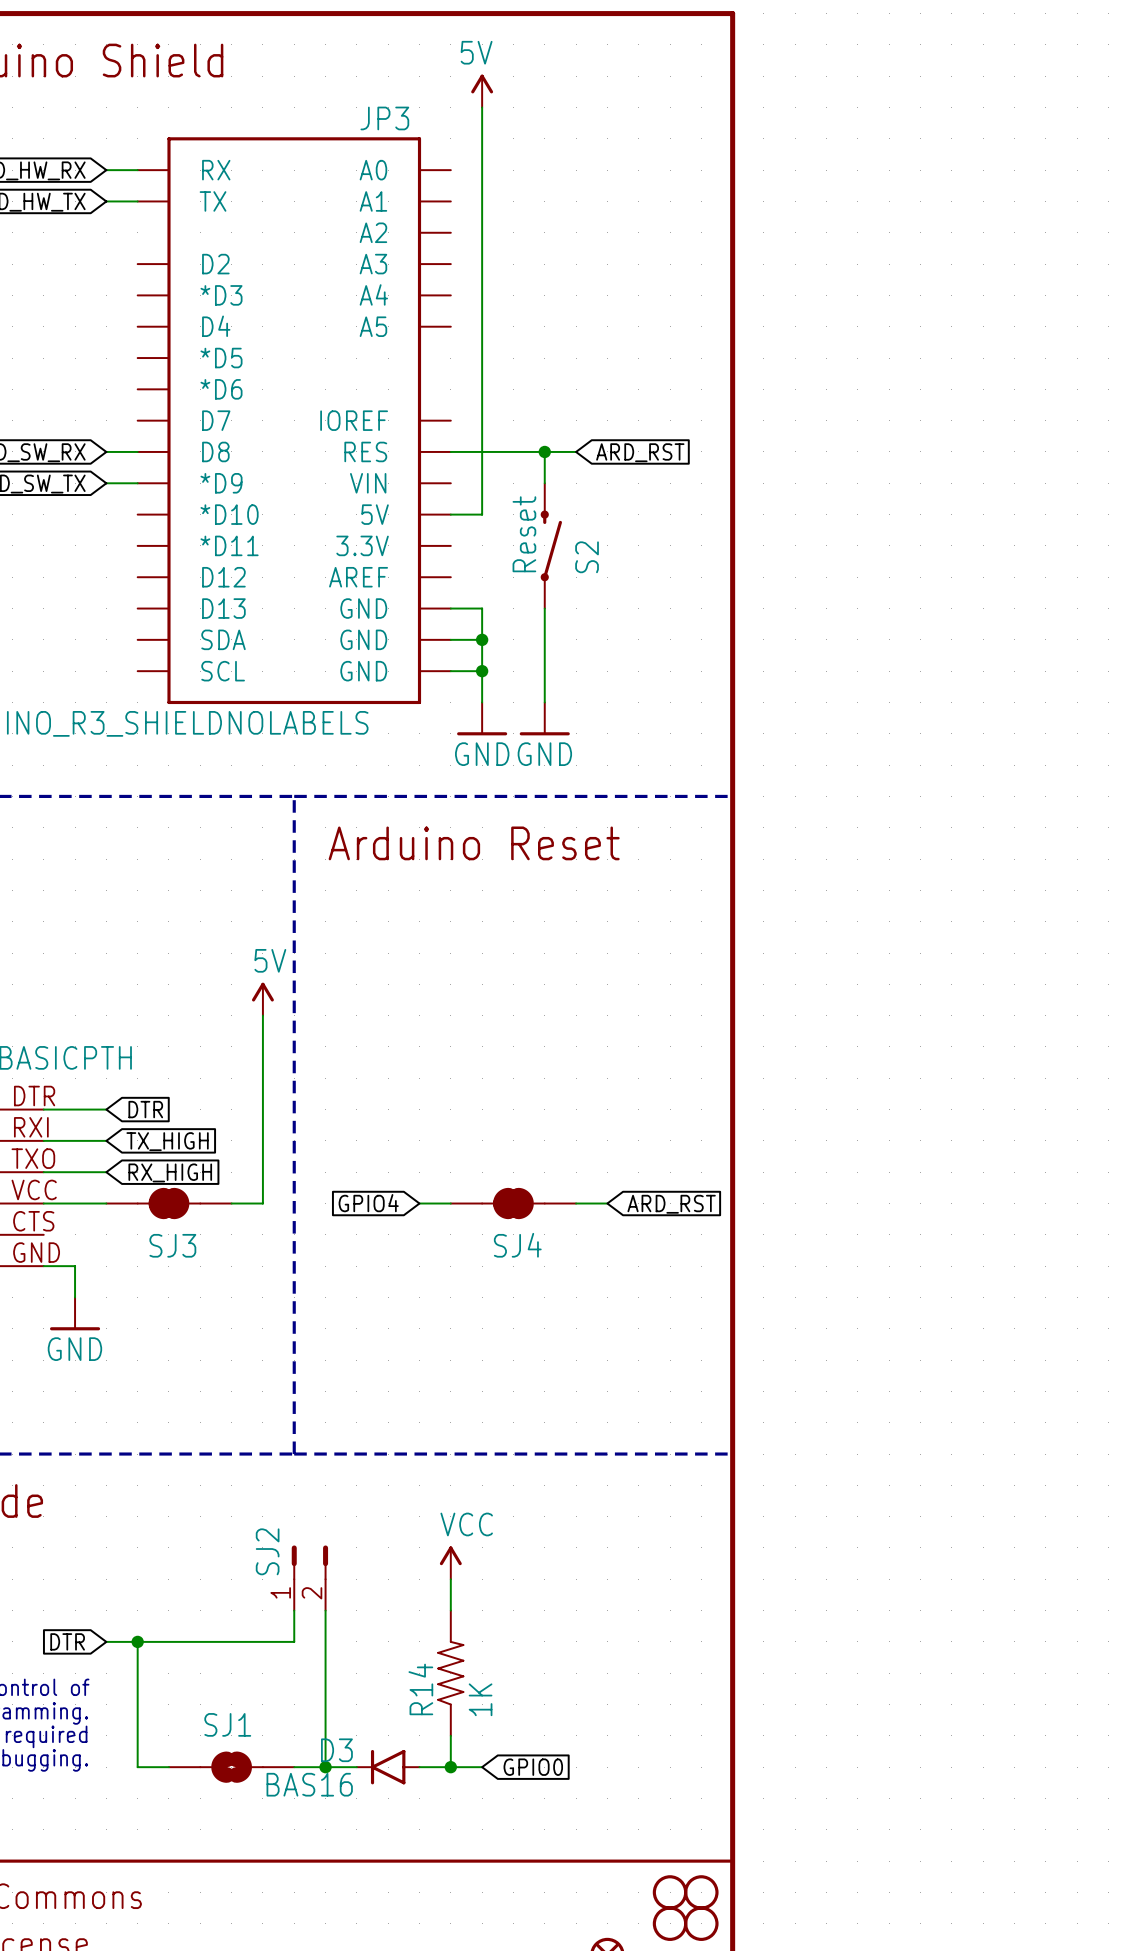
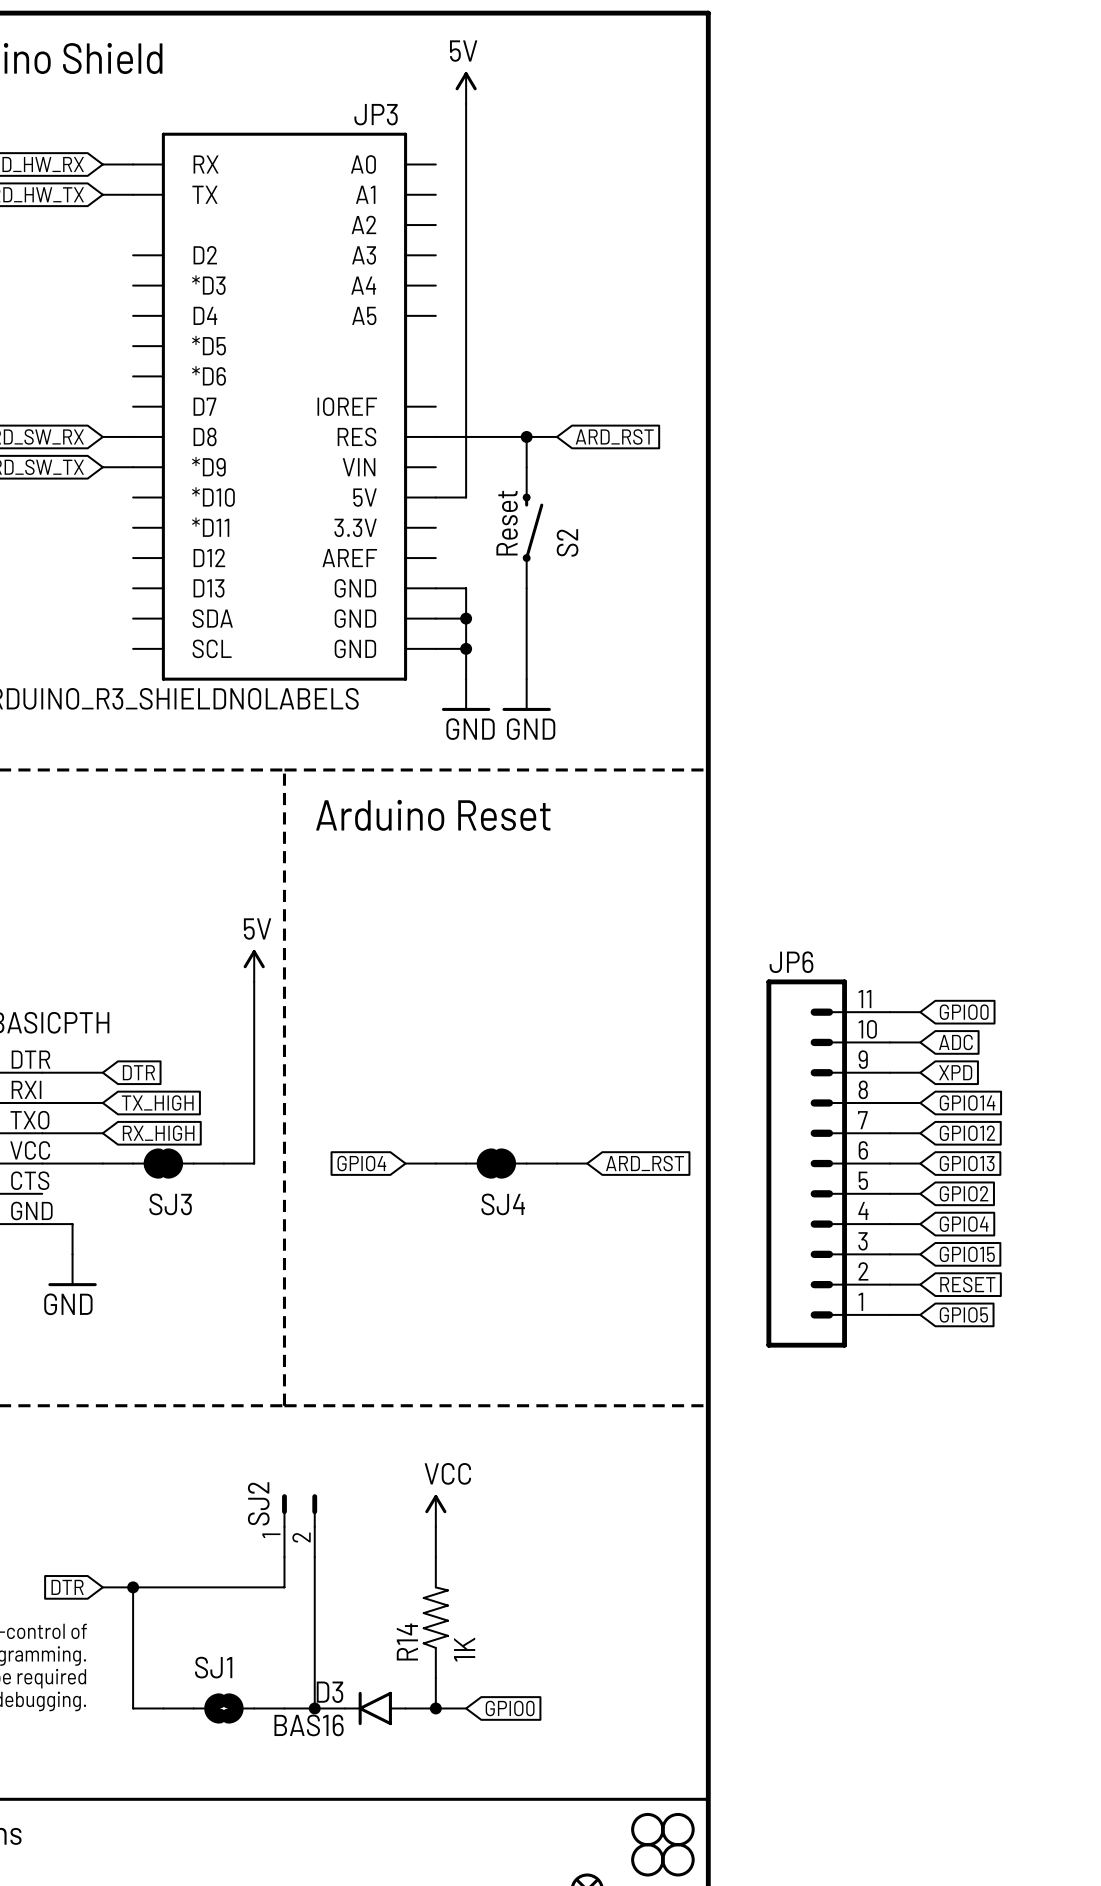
wire: none -> (889, 1012) (920, 1012)
global label: none -> GPIO0 (964, 1012)
wire: none -> (889, 1042) (920, 1042)
global label: none -> ADC (955, 1042)
wire: none -> (889, 1072) (920, 1072)
global label: none -> XPD (955, 1072)
wire: none -> (889, 1102) (920, 1102)
global label: none -> GPIO14 (967, 1102)
wire: none -> (889, 1133) (920, 1133)
global label: none -> GPIO12 (967, 1133)
JP6: none -> (828, 1163)
wire: none -> (889, 1163) (920, 1163)
global label: none -> GPIO13 (967, 1163)
wire: none -> (889, 1193) (920, 1193)
global label: none -> GPIO2 (964, 1193)
global label: none -> GPIO4 (964, 1224)
wire: none -> (889, 1224) (920, 1224)
wire: none -> (889, 1254) (920, 1254)
global label: none -> GPIO15 (967, 1254)
wire: none -> (889, 1284) (920, 1284)
global label: none -> RESET (967, 1284)
wire: none -> (889, 1314) (920, 1314)
global label: none -> GPIO5 (963, 1314)

